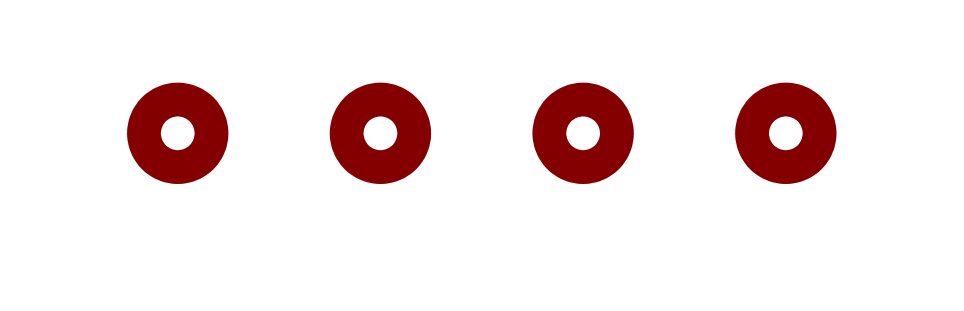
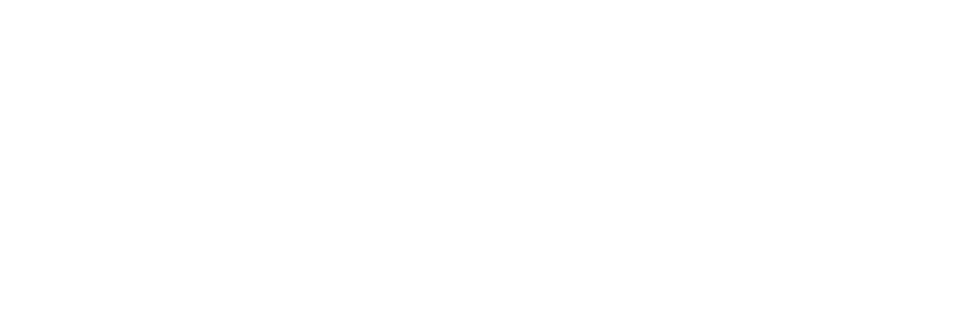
part: (177, 133) -> none
part: (380, 133) -> none
part: (583, 133) -> none
part: (785, 133) -> none

